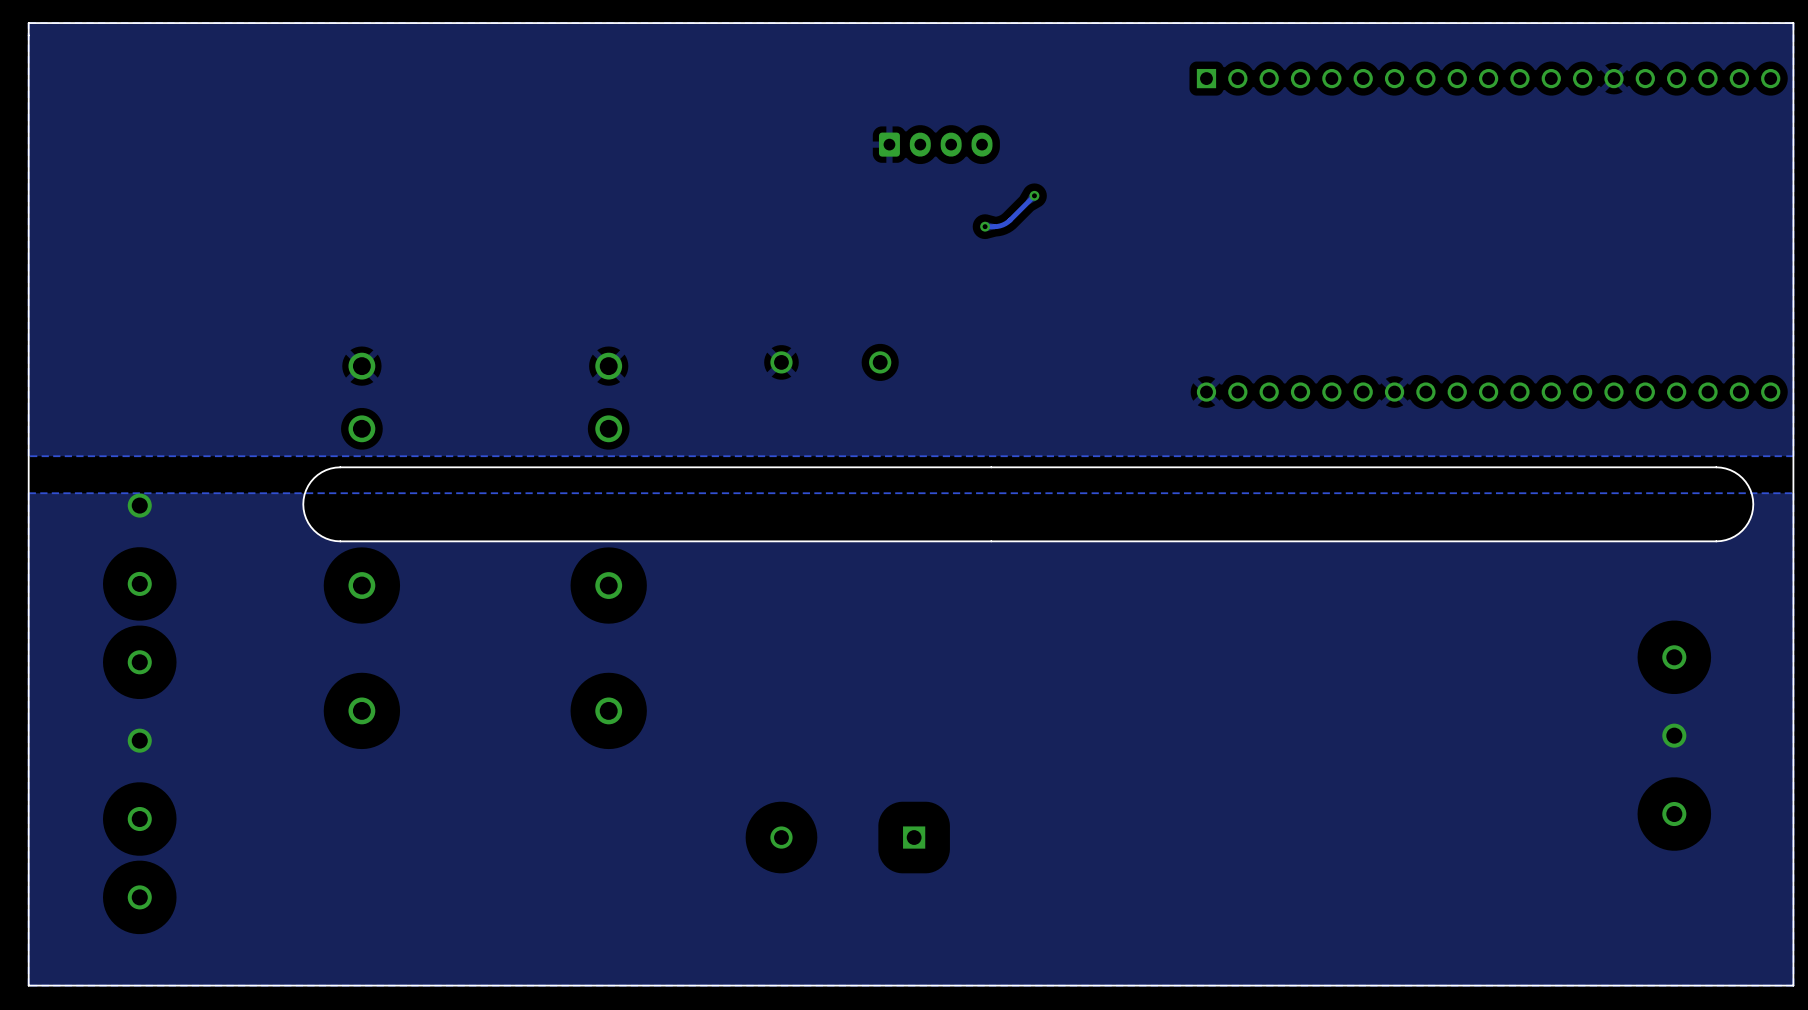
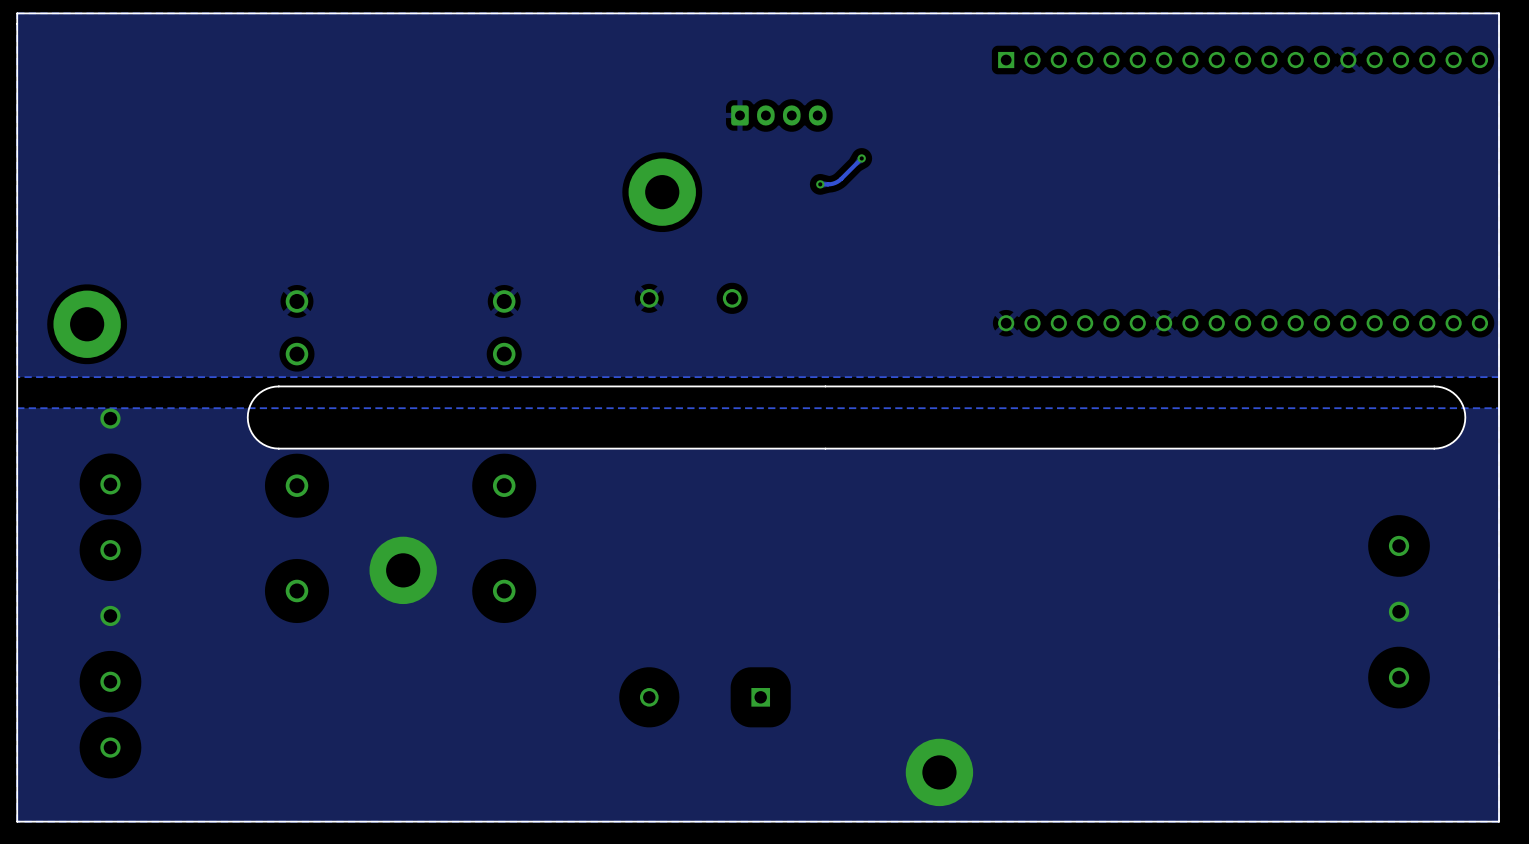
via: none -> (662, 192)
via: none -> (87, 324)
via: none -> (403, 570)
via: none -> (939, 772)

